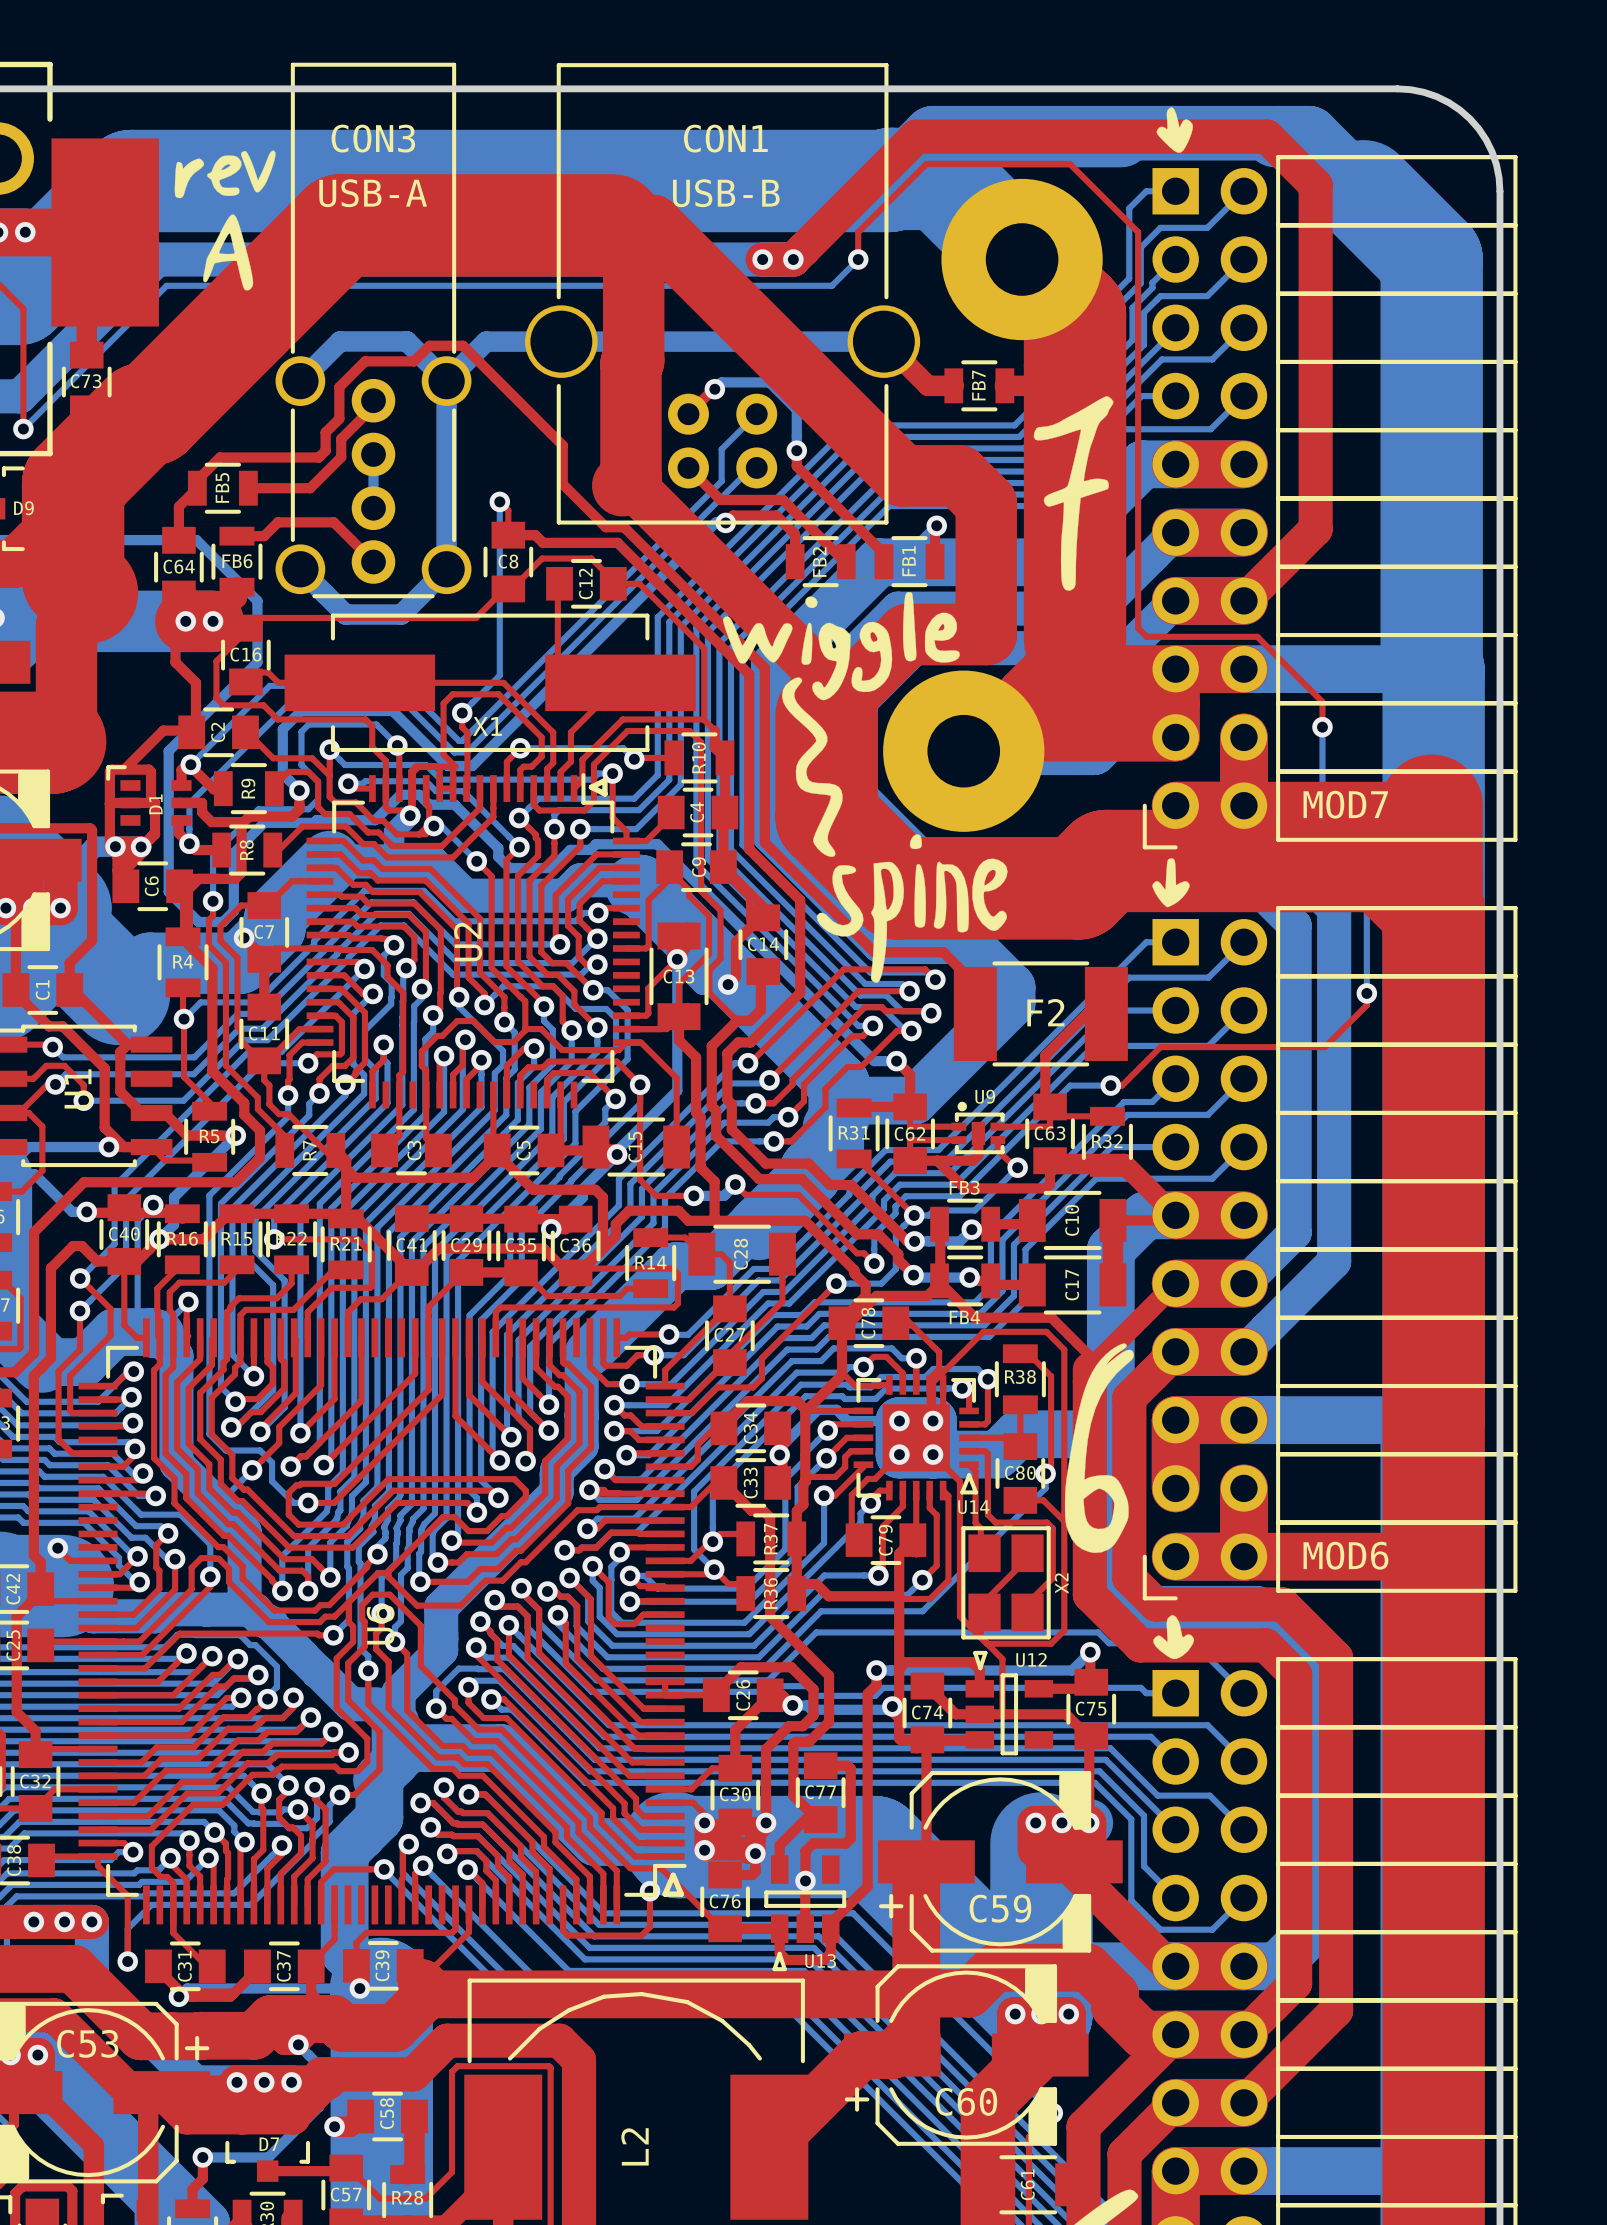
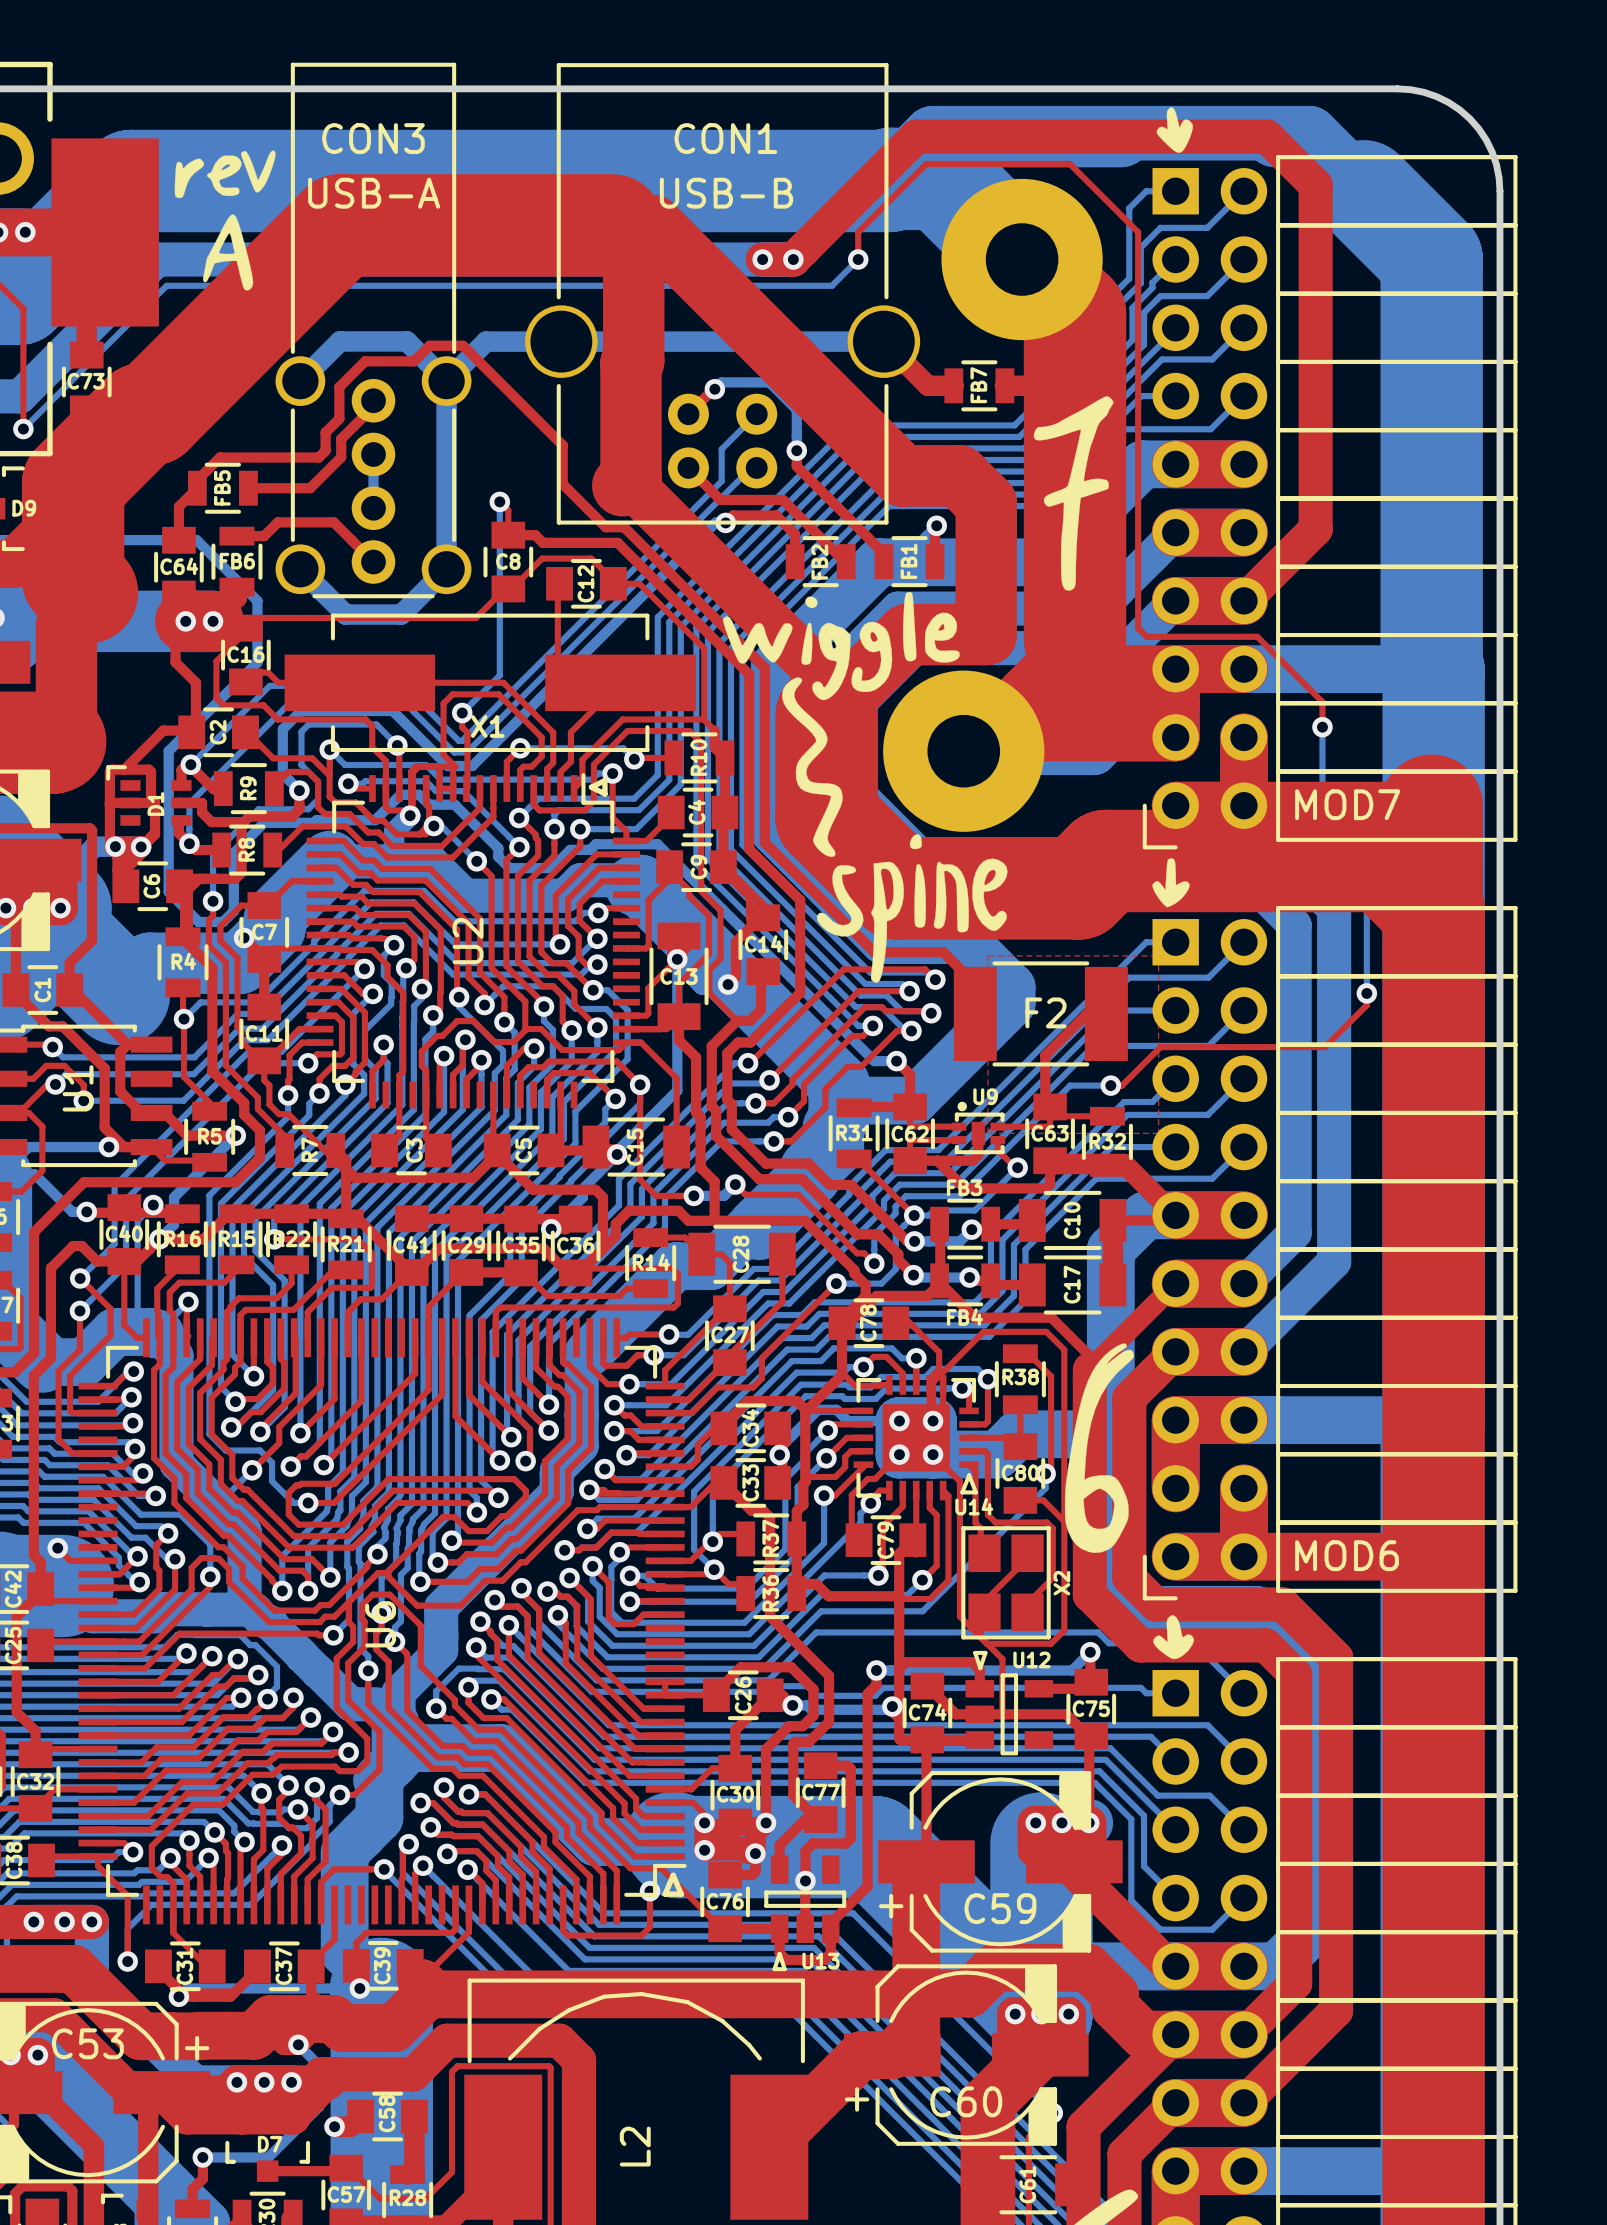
top zone outline: none -> (987, 955) (987, 1133) (1158, 1133) (1158, 955) (987, 955)

